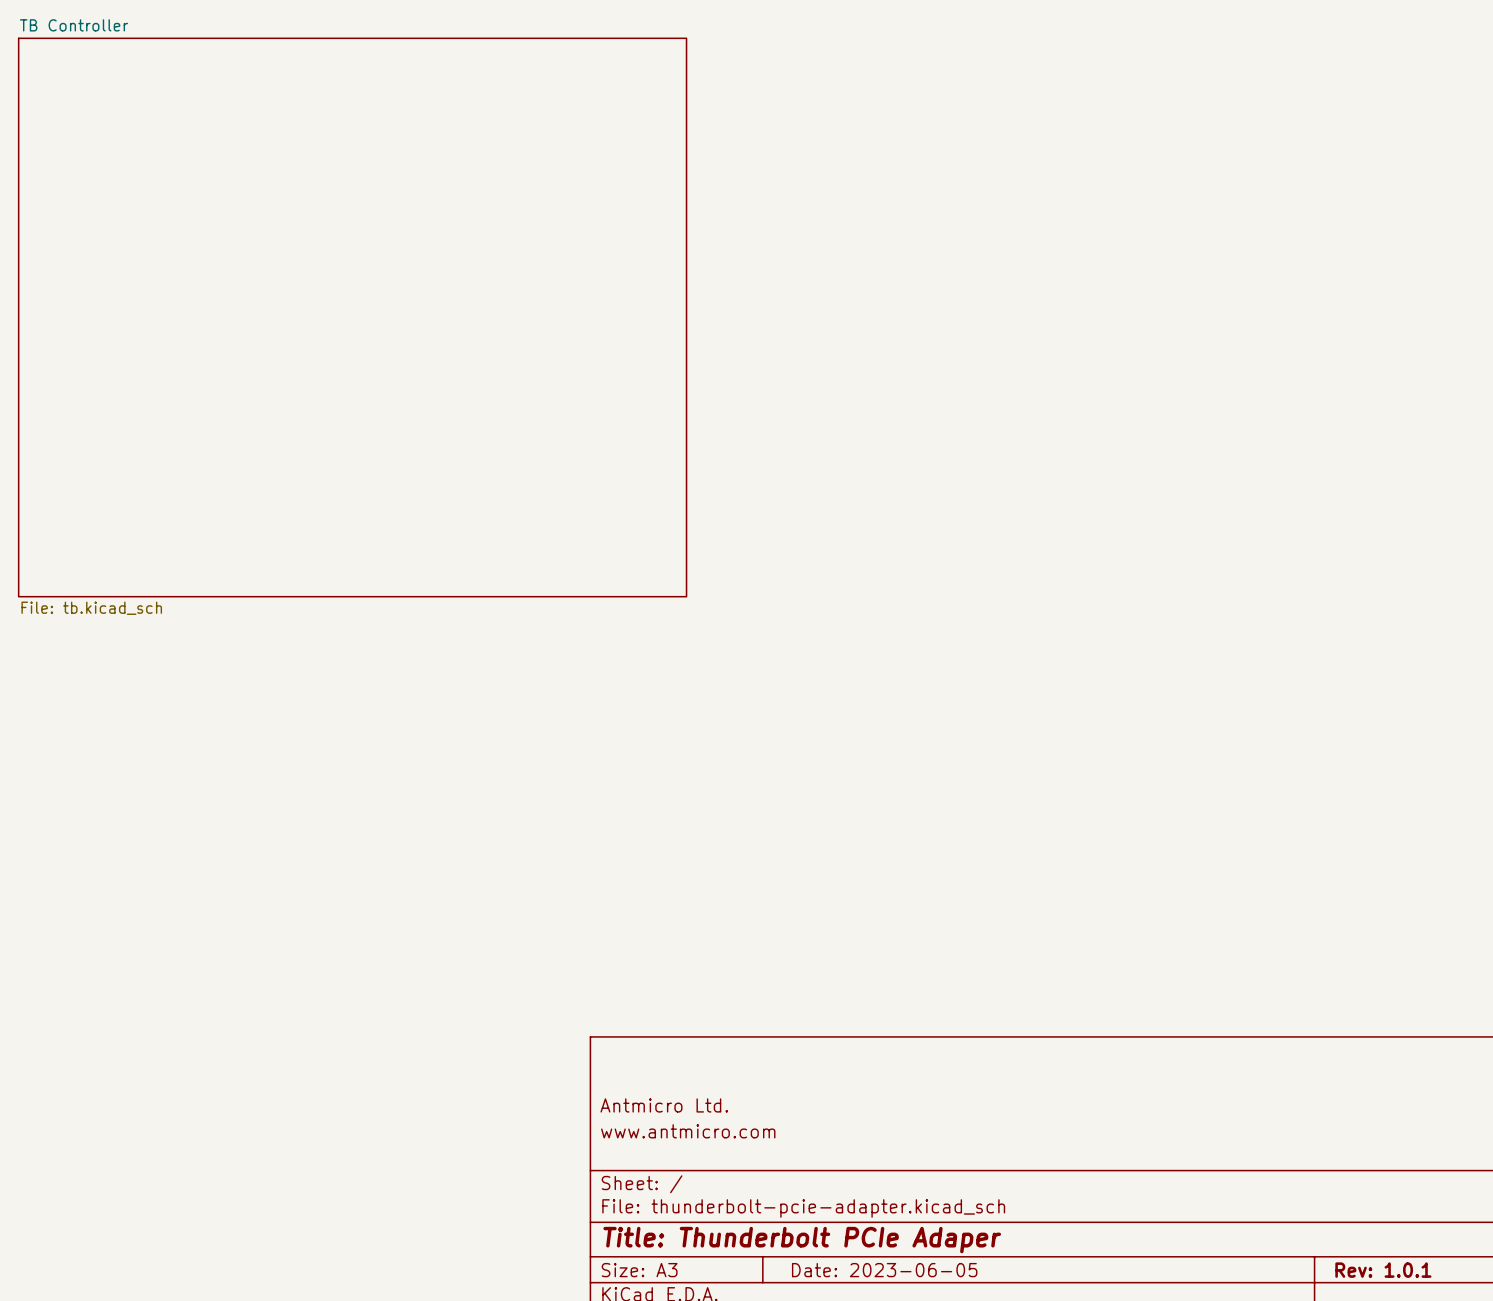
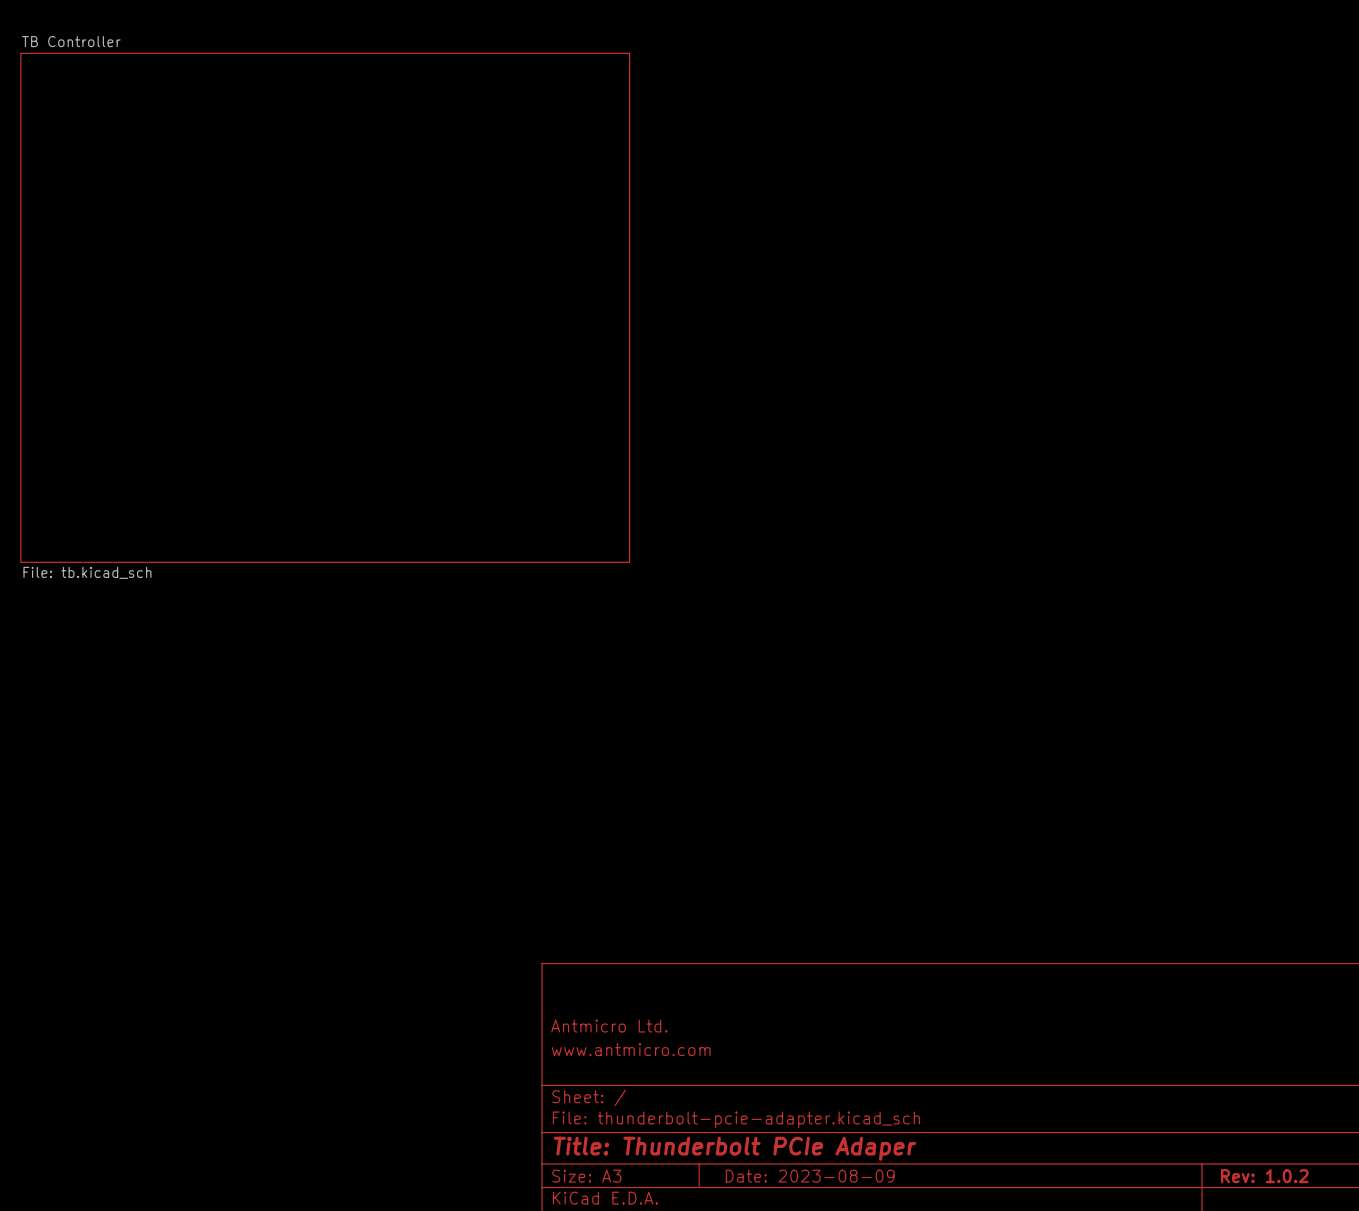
title block: Date: 2023-06-05 (884, 1270) -> Date: 2023-08-09 (810, 1176)
title block: Rev: 1.0.1 (1383, 1270) -> Rev: 1.0.2 (1264, 1176)

